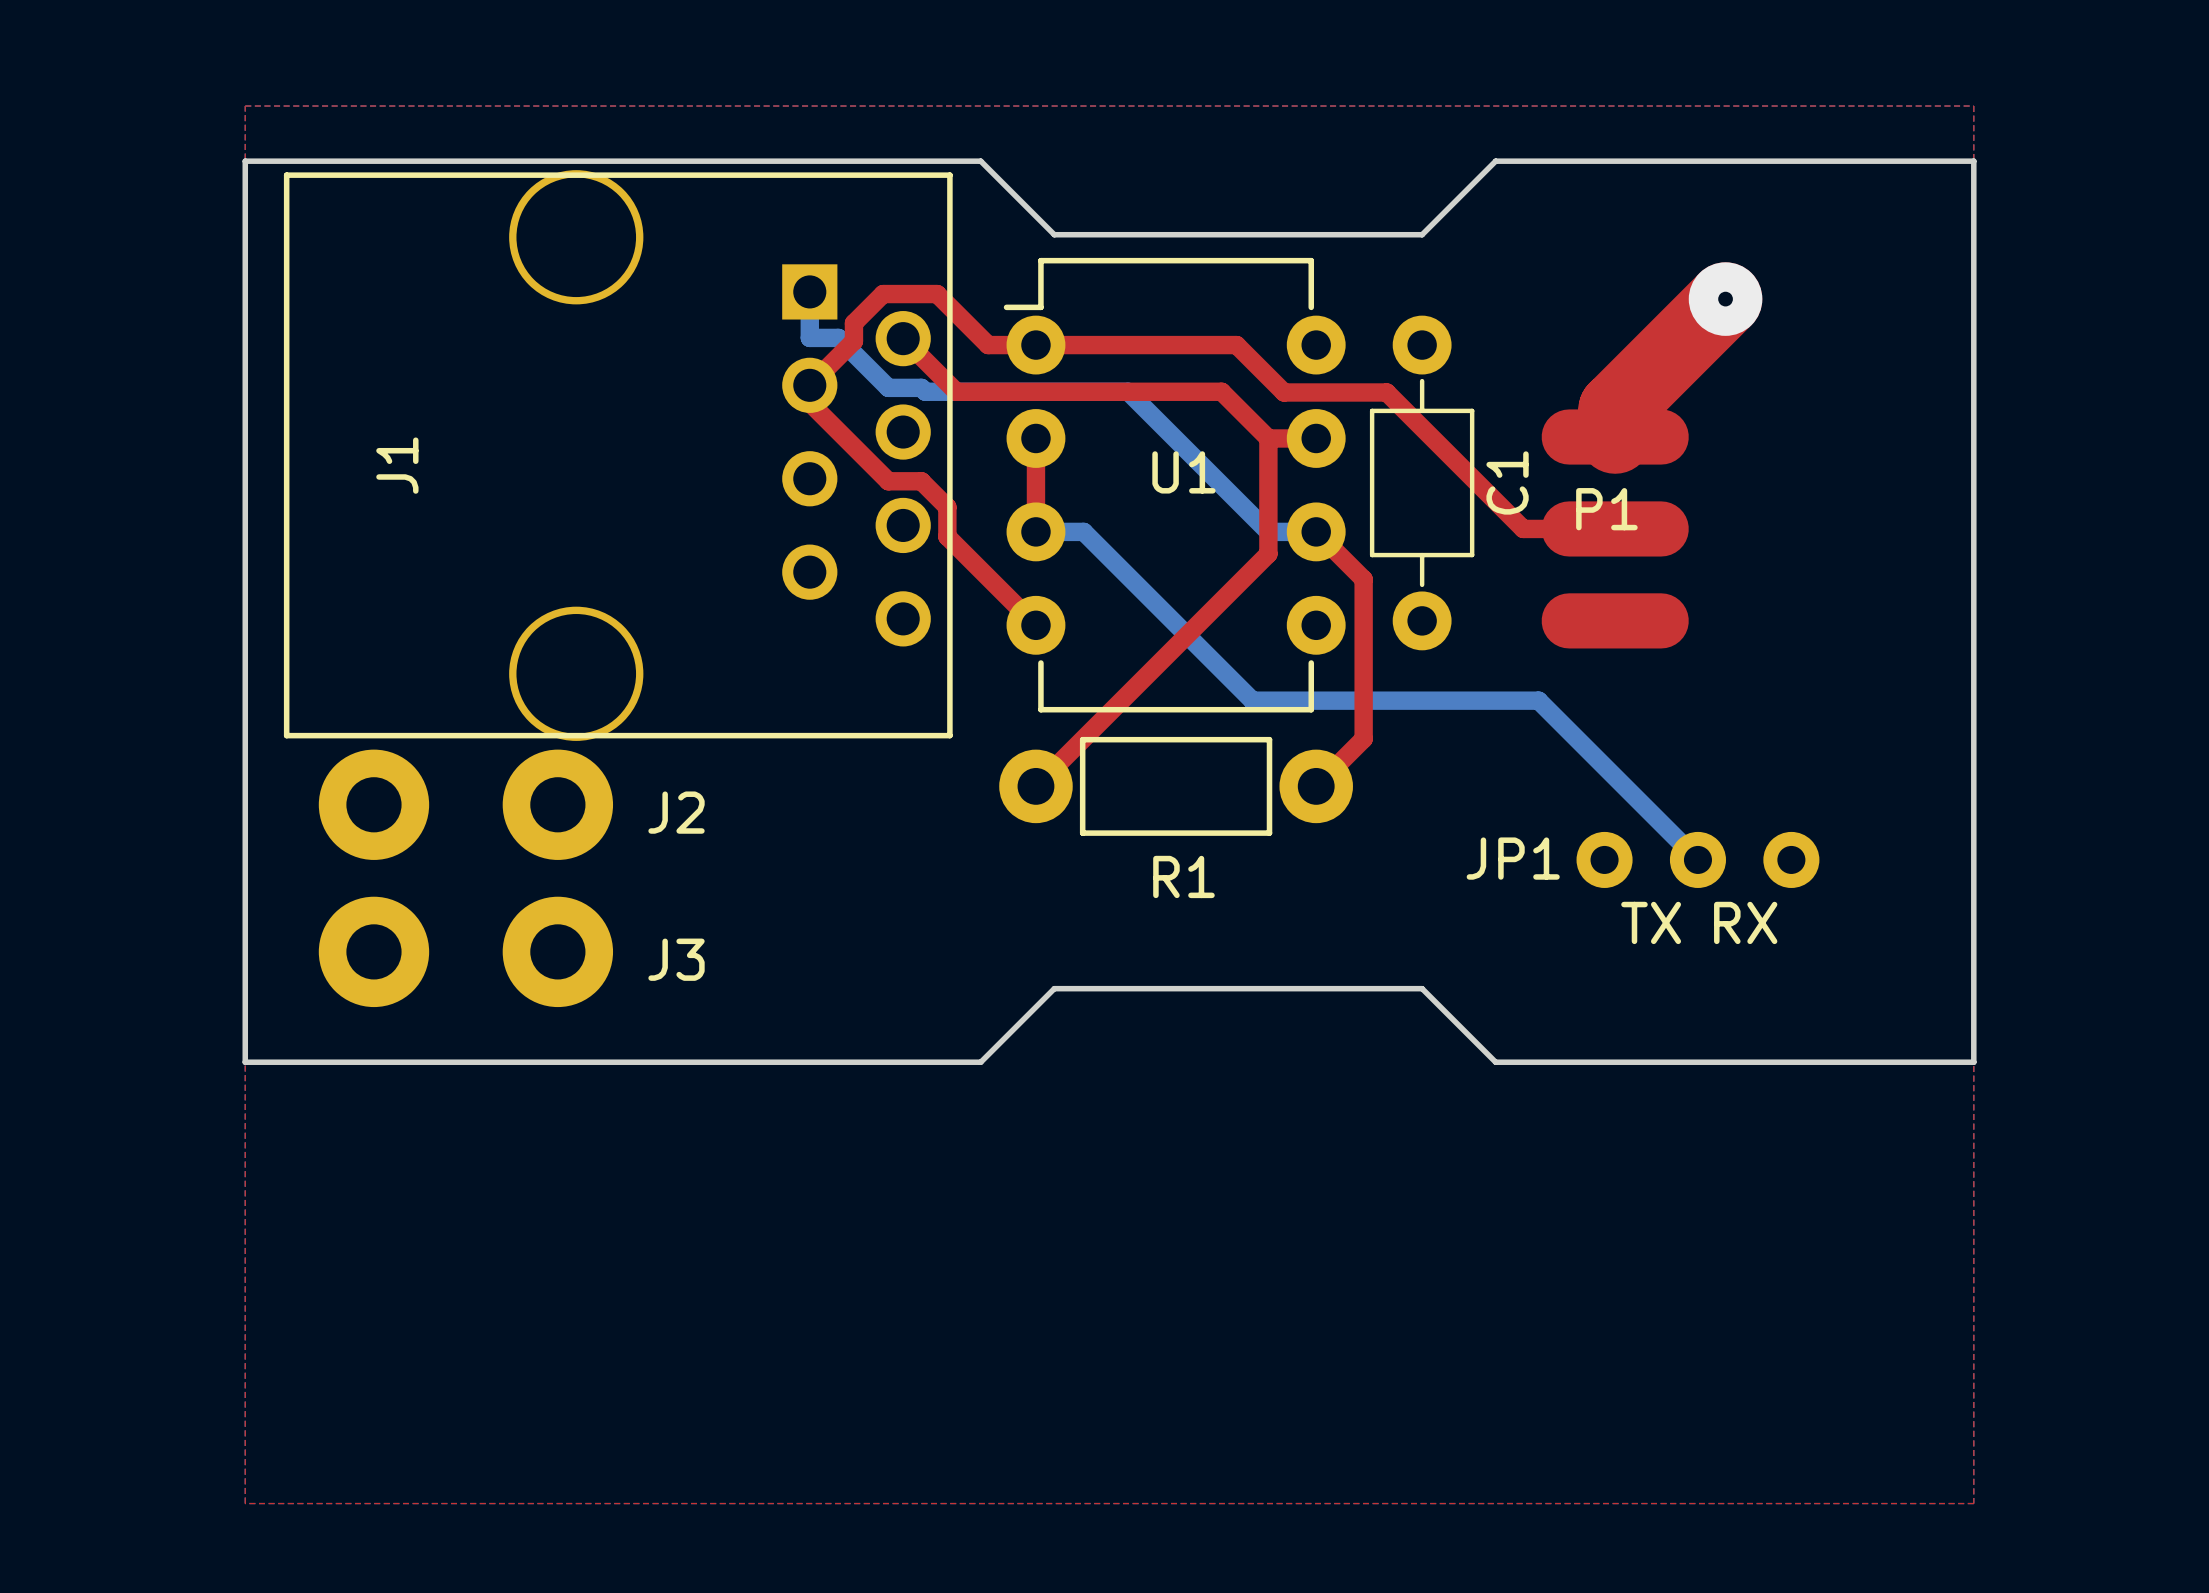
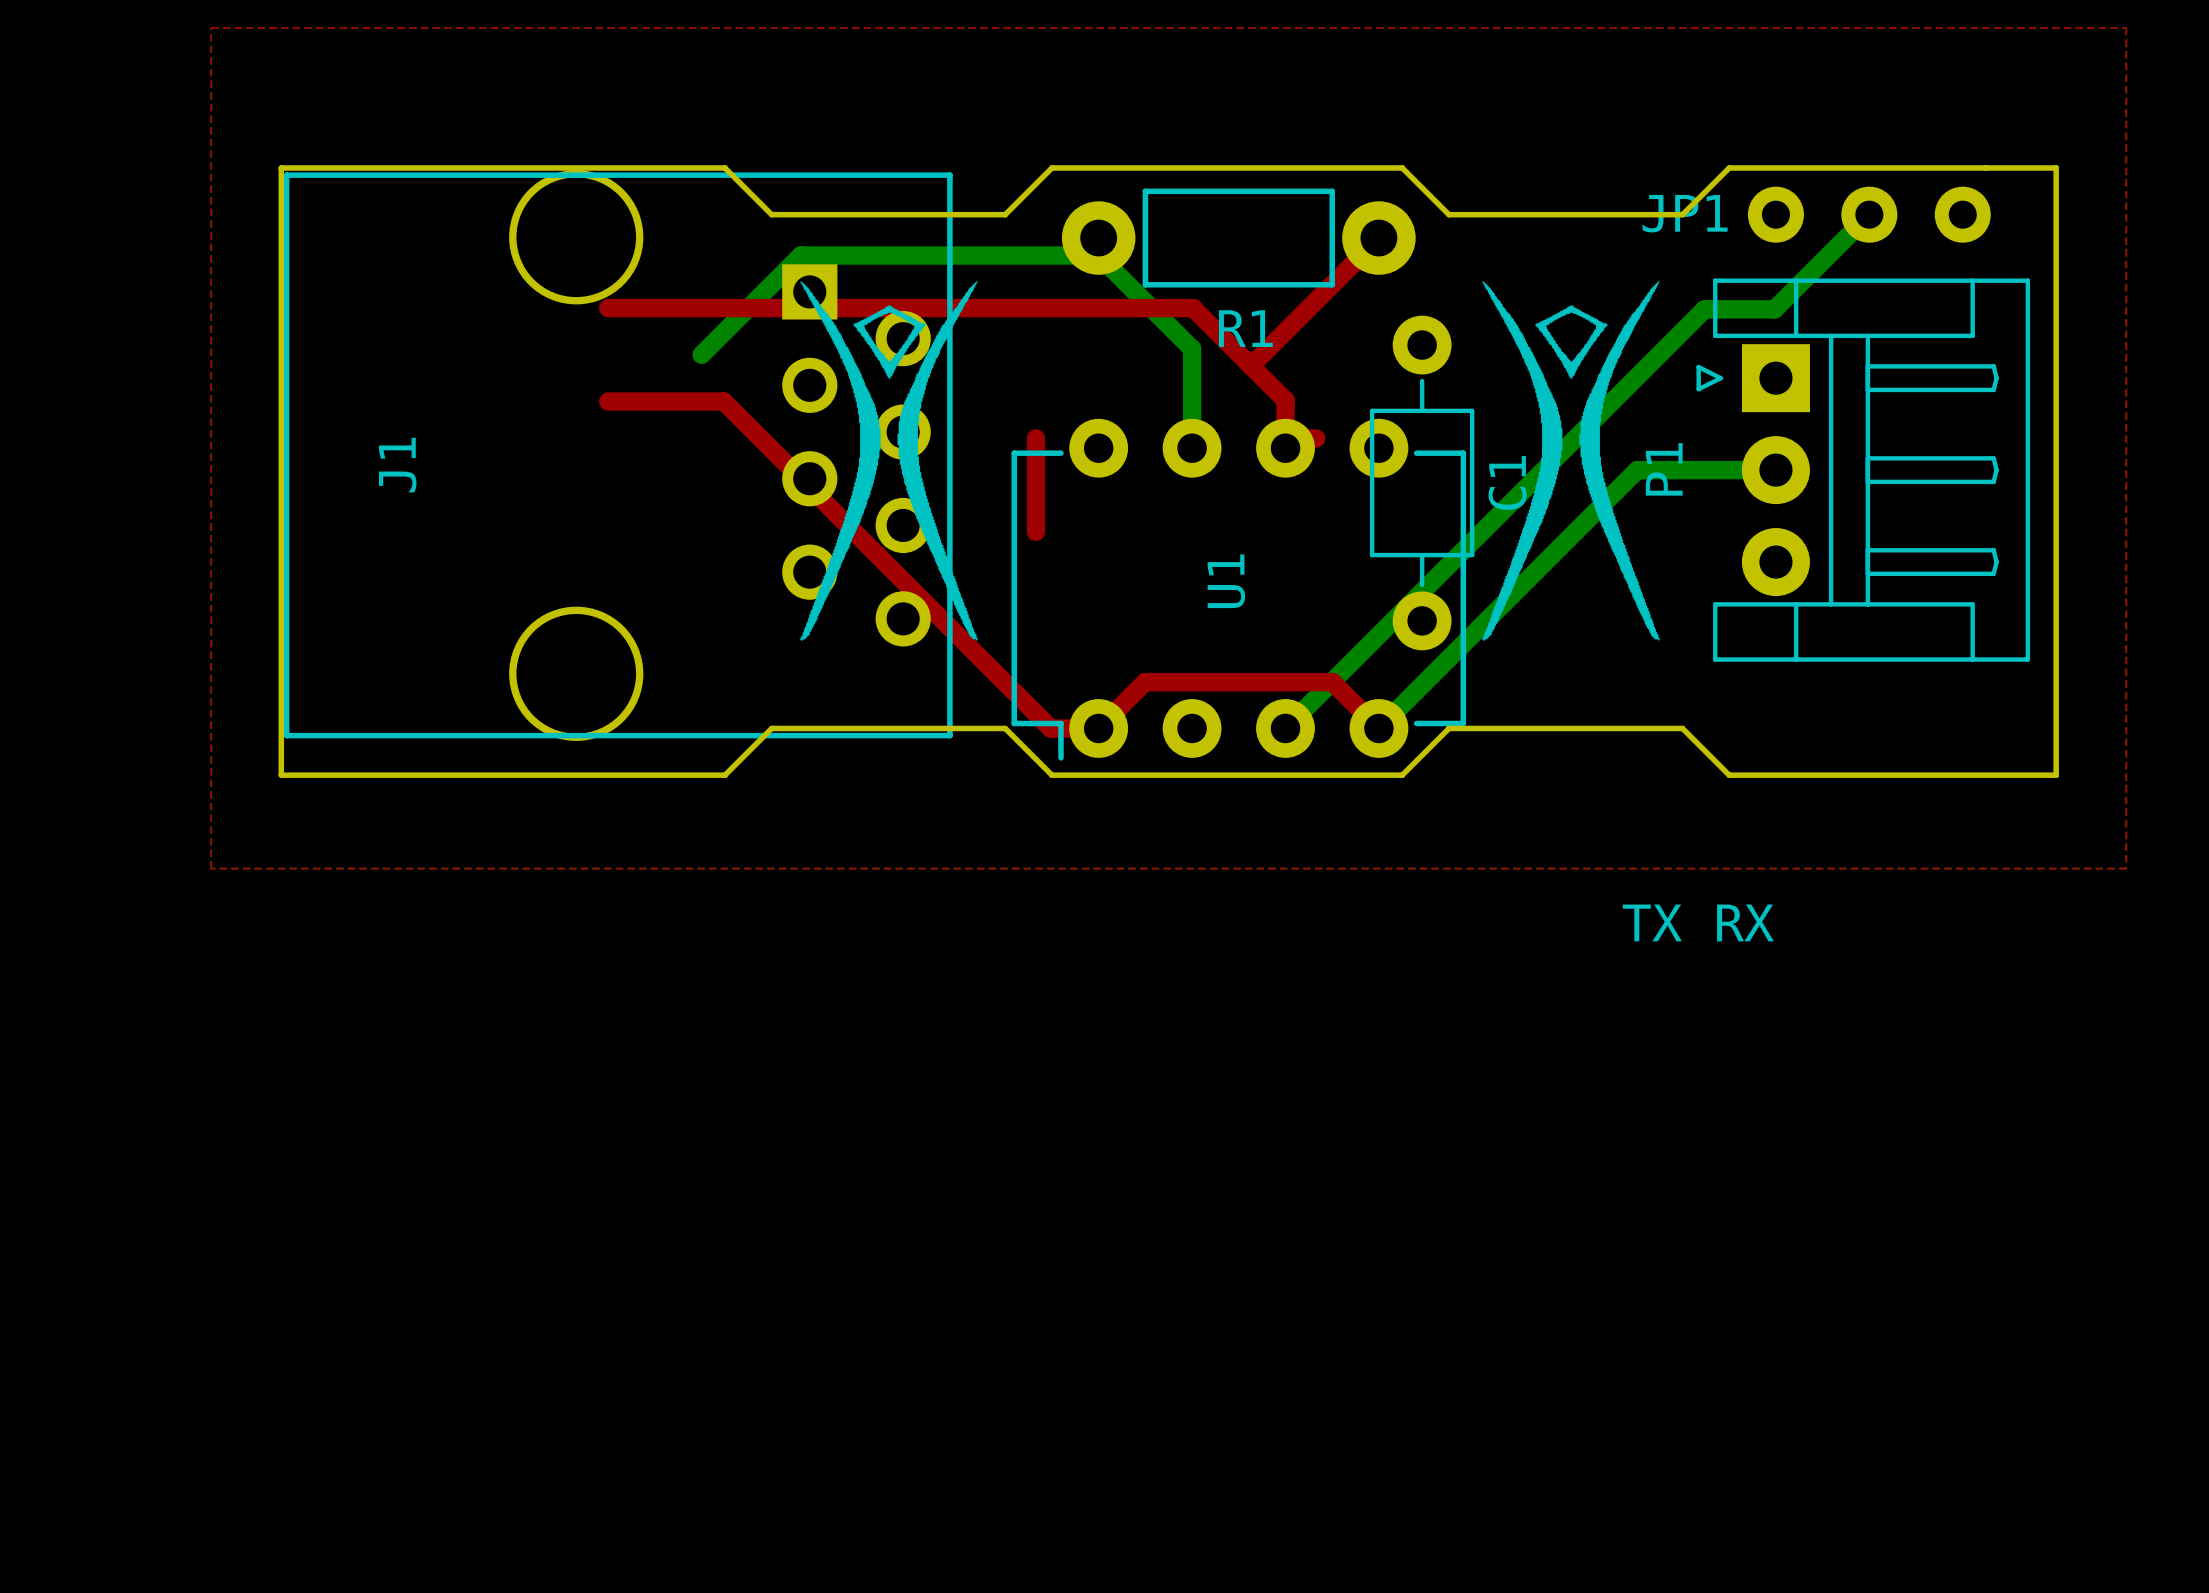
top zone outline: none -> (211, 27) (211, 868) (2126, 868) (2126, 27) (211, 27)
top zone outline: (245, 106) (245, 1503) (1973, 1503) (1973, 106) (245, 106) -> none
board edge: (245, 161) (245, 1062) (980, 1062) (1054, 988) (1422, 988) (1495, 1062) (1973, 1062) (1973, 161) (1495, 161) (1422, 234) (1054, 234) (980, 161) (245, 161) -> (281, 167) (281, 775) (725, 775) (771, 728) (1005, 728) (1051, 775) (1402, 775) (1448, 728) (1682, 728) (1729, 775) (2056, 775) (2056, 167) (1729, 167) (1682, 214) (1448, 214) (1402, 167) (1051, 167) (1005, 214) (771, 214) (725, 167) (281, 167)
bottom track: none -> (1869, 214) (1774, 309) (1704, 309) (1285, 728)
top track: none -> (1378, 238) (1251, 365)
bottom track: none -> (1098, 255) (1192, 348) (1192, 448)
bottom track: none -> (1098, 255) (800, 255) (701, 354)
drawing: none -> [800, 281, 978, 641]
drawing: none -> [1482, 281, 1660, 641]
bottom track: (809, 291) (809, 337) (838, 337) (888, 387) (921, 387) (925, 391) (1128, 391) (1268, 531) (1316, 531) -> none
top track: (1725, 299) (1615, 409) (1615, 437) -> none
via: (1725, 299) -> none
top track: none -> (608, 308) (1193, 308) (1285, 400) (1285, 448)
top track: (903, 338) (956, 391) (1221, 391) (1268, 438) (1268, 553) (1035, 786) -> none
top track: none -> (608, 401) (723, 401) (1050, 728) (1098, 728) (1145, 682) (1332, 682) (1378, 728)
P1 footprint: [1541, 409, 1689, 649] -> [1696, 278, 2031, 662]
bottom track: none -> (1775, 470) (1637, 470) (1378, 728)
U1 rotation: 0° (1174, 485) -> 90° counterclockwise (1238, 589)
P1 name position: P1 (1606, 509) -> P1 (1664, 469)
top track: (1615, 528) (1523, 528) (1386, 392) (1284, 392) (1236, 345) (988, 345) (937, 294) (883, 294) (853, 323) (853, 341) (809, 385) (809, 402) (888, 481) (921, 481) (947, 507) (947, 536) (1035, 625) -> none
bottom track: (1035, 531) (1083, 531) (1252, 700) (1538, 700) (1697, 859) -> none
top track: (1316, 531) (1363, 579) (1363, 738) (1316, 786) -> none
R1 position: (1176, 786) -> (1238, 238)
J2: (465, 804) -> none
JP1 position: (1697, 859) -> (1869, 214)
J3: (465, 951) -> none

